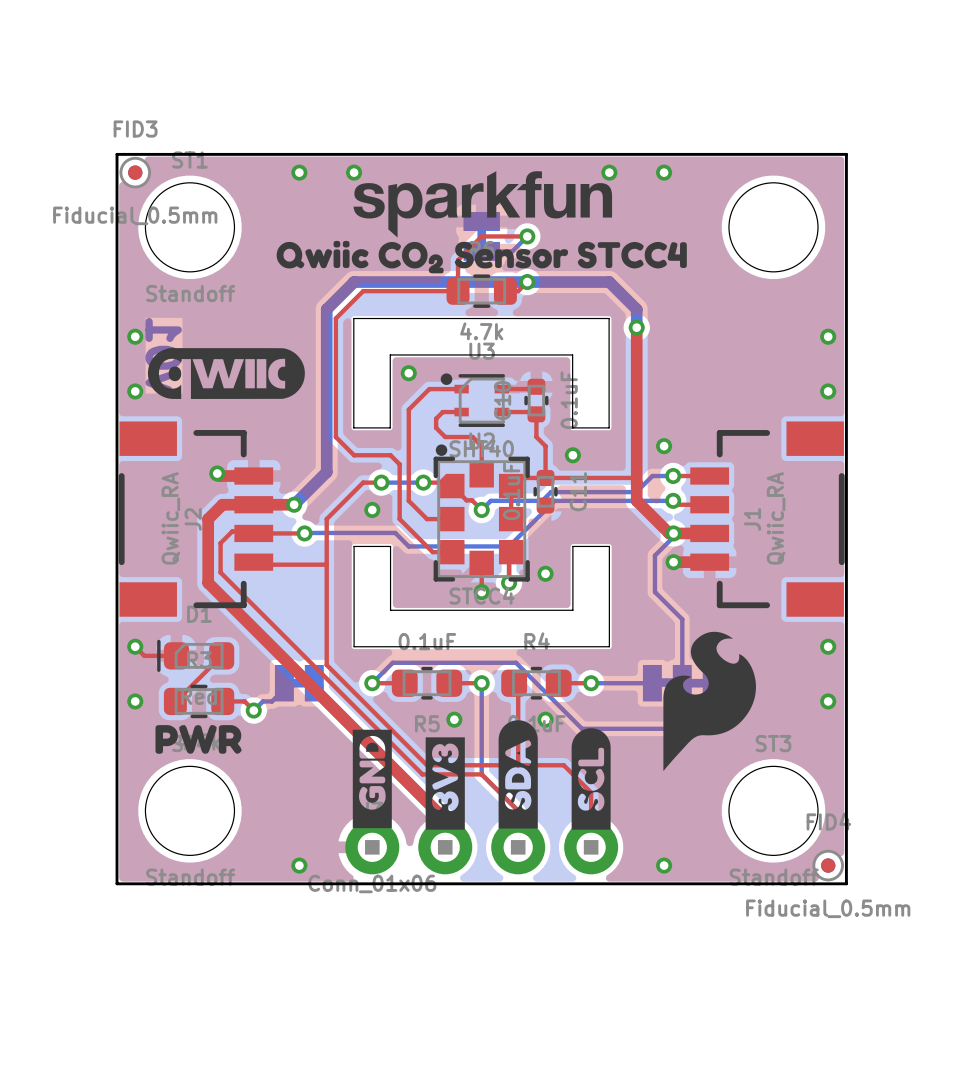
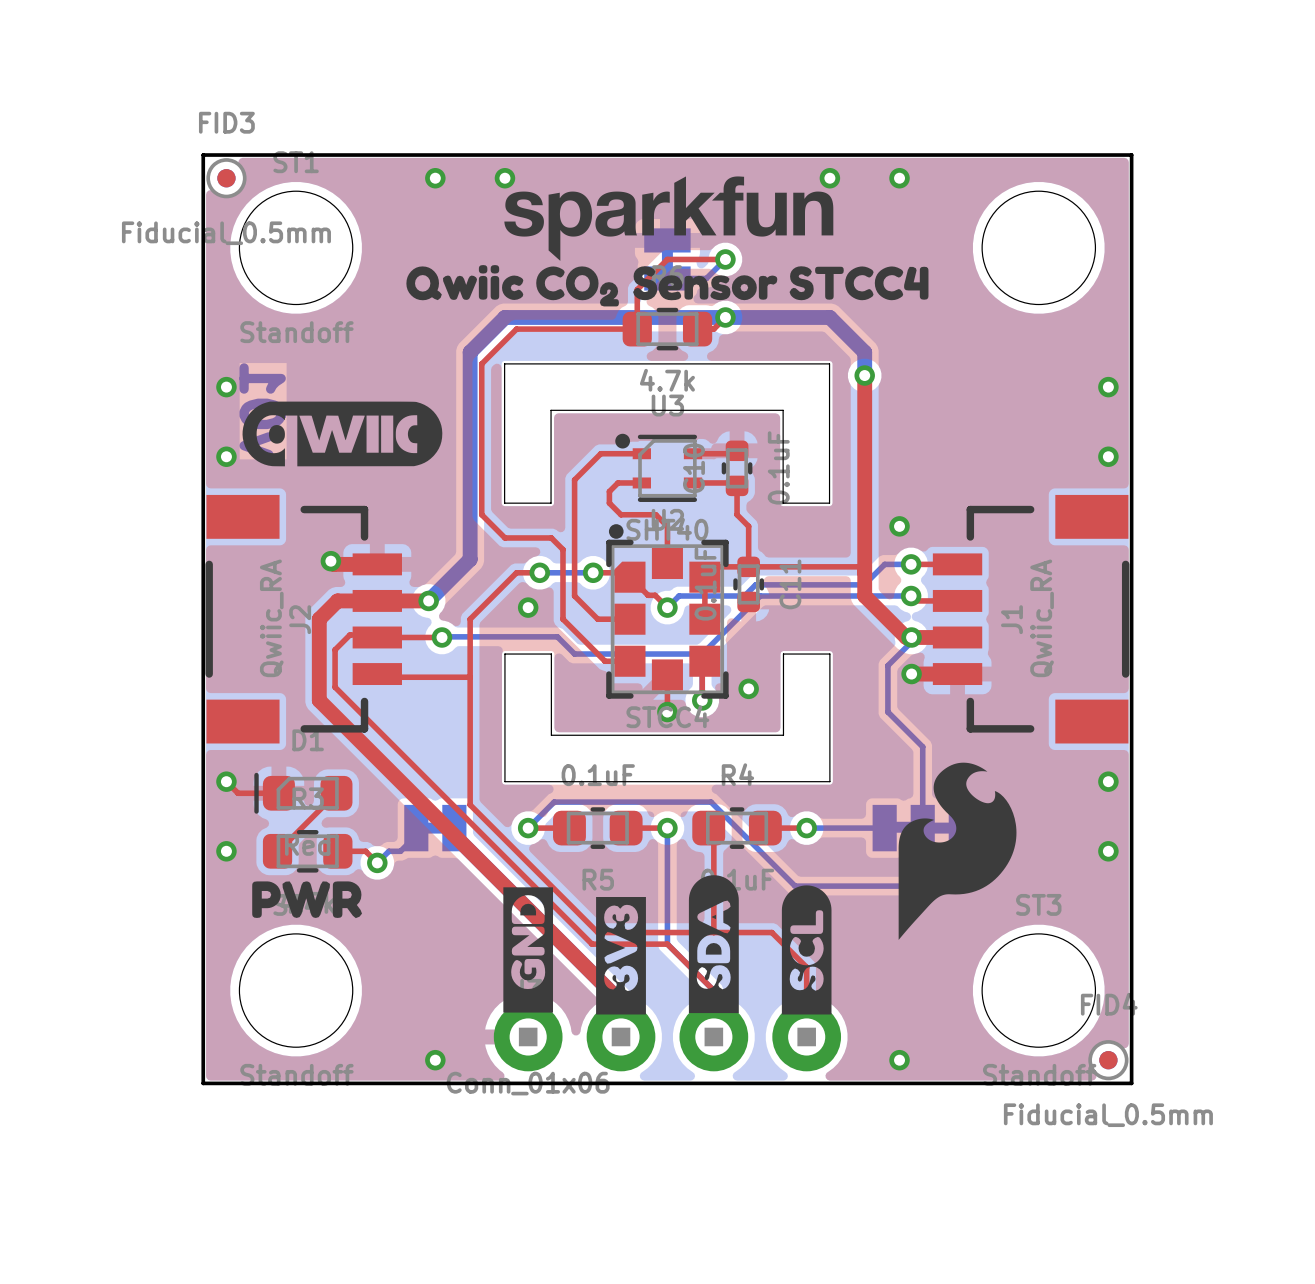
via: (408, 373) -> none
via: (572, 455) -> none
via: (454, 719) -> none
via: (545, 719) -> none

